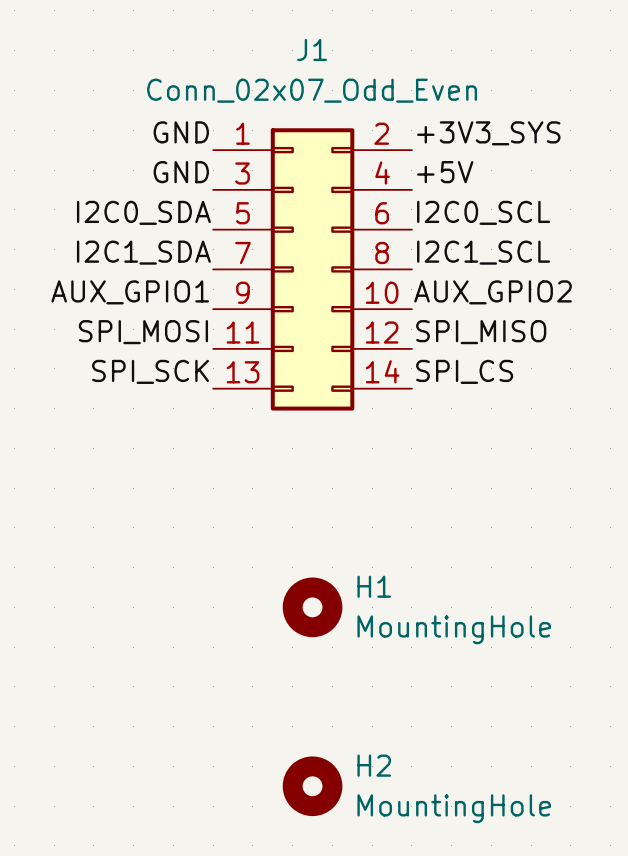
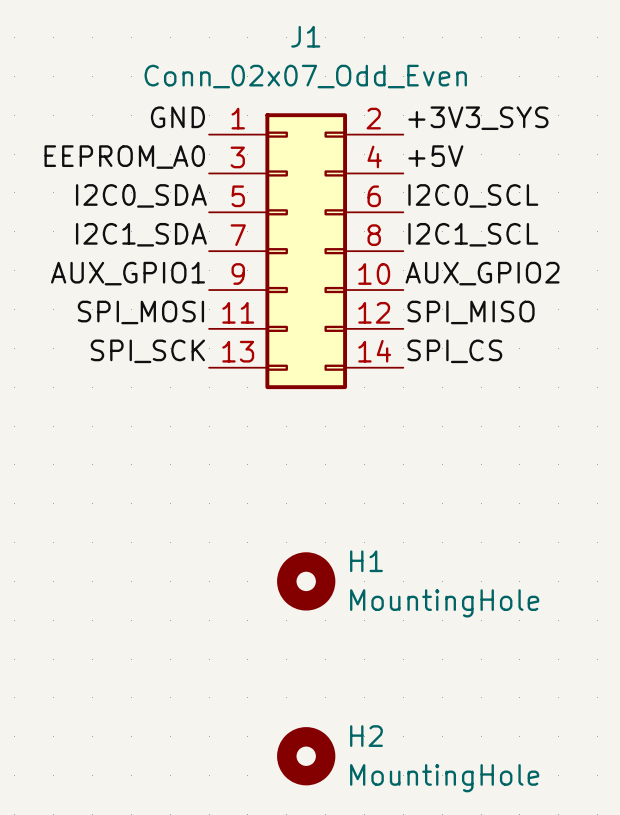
label: GND (181, 172) -> EEPROM_A0 (124, 157)

